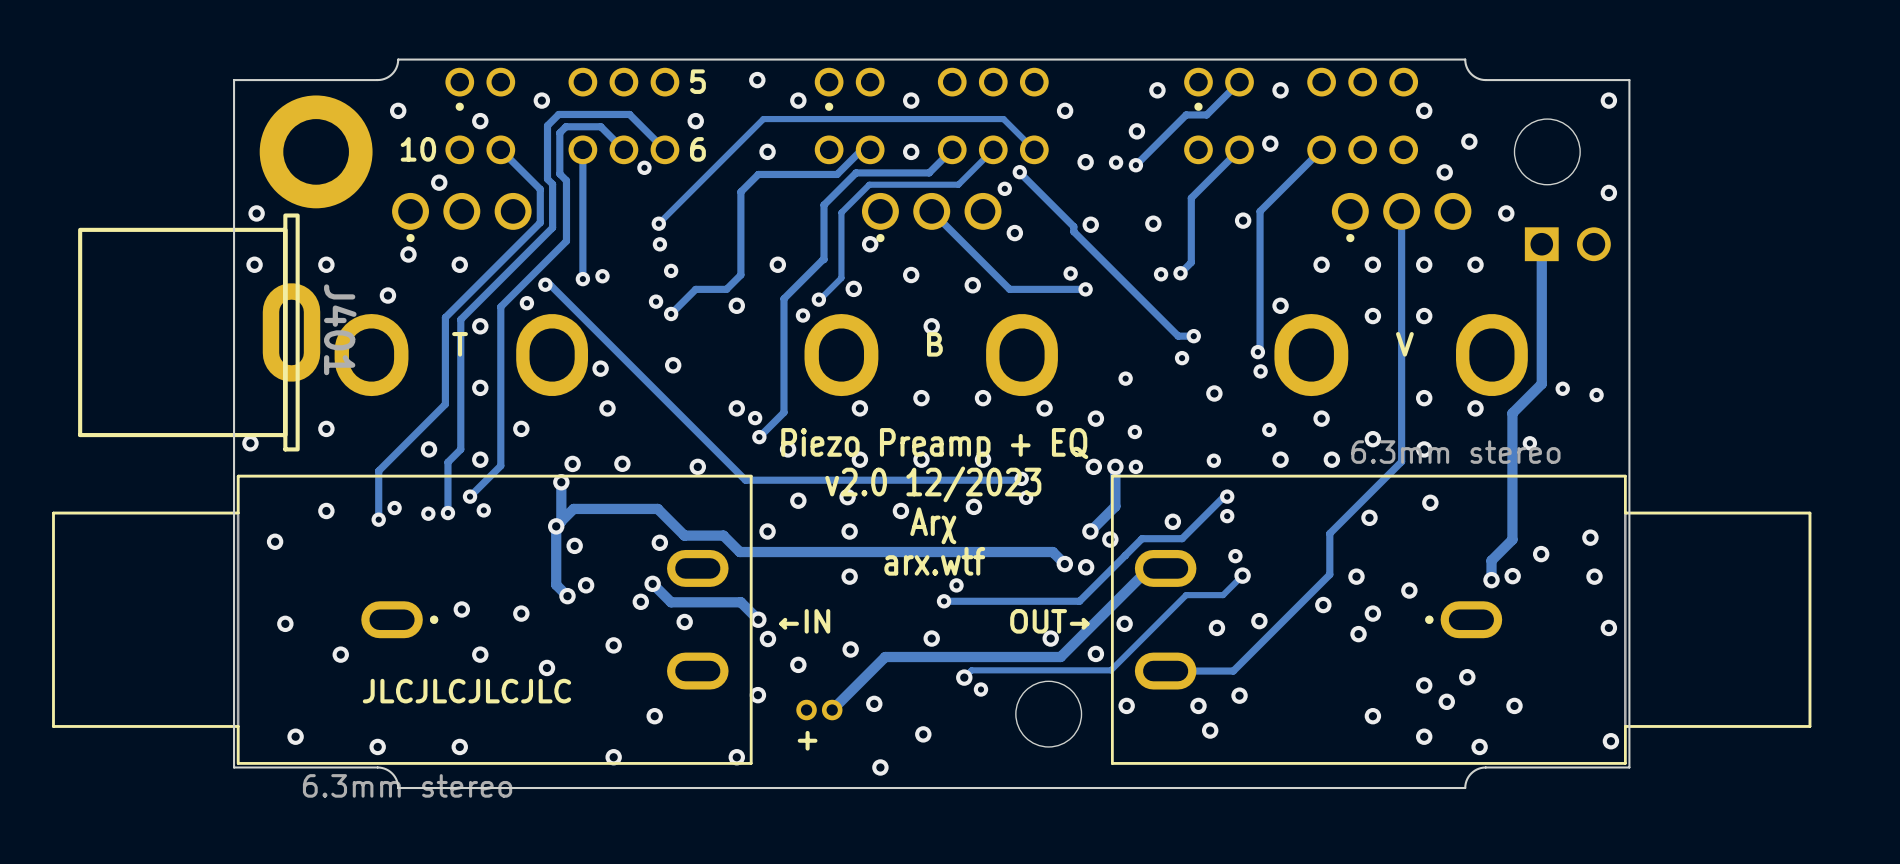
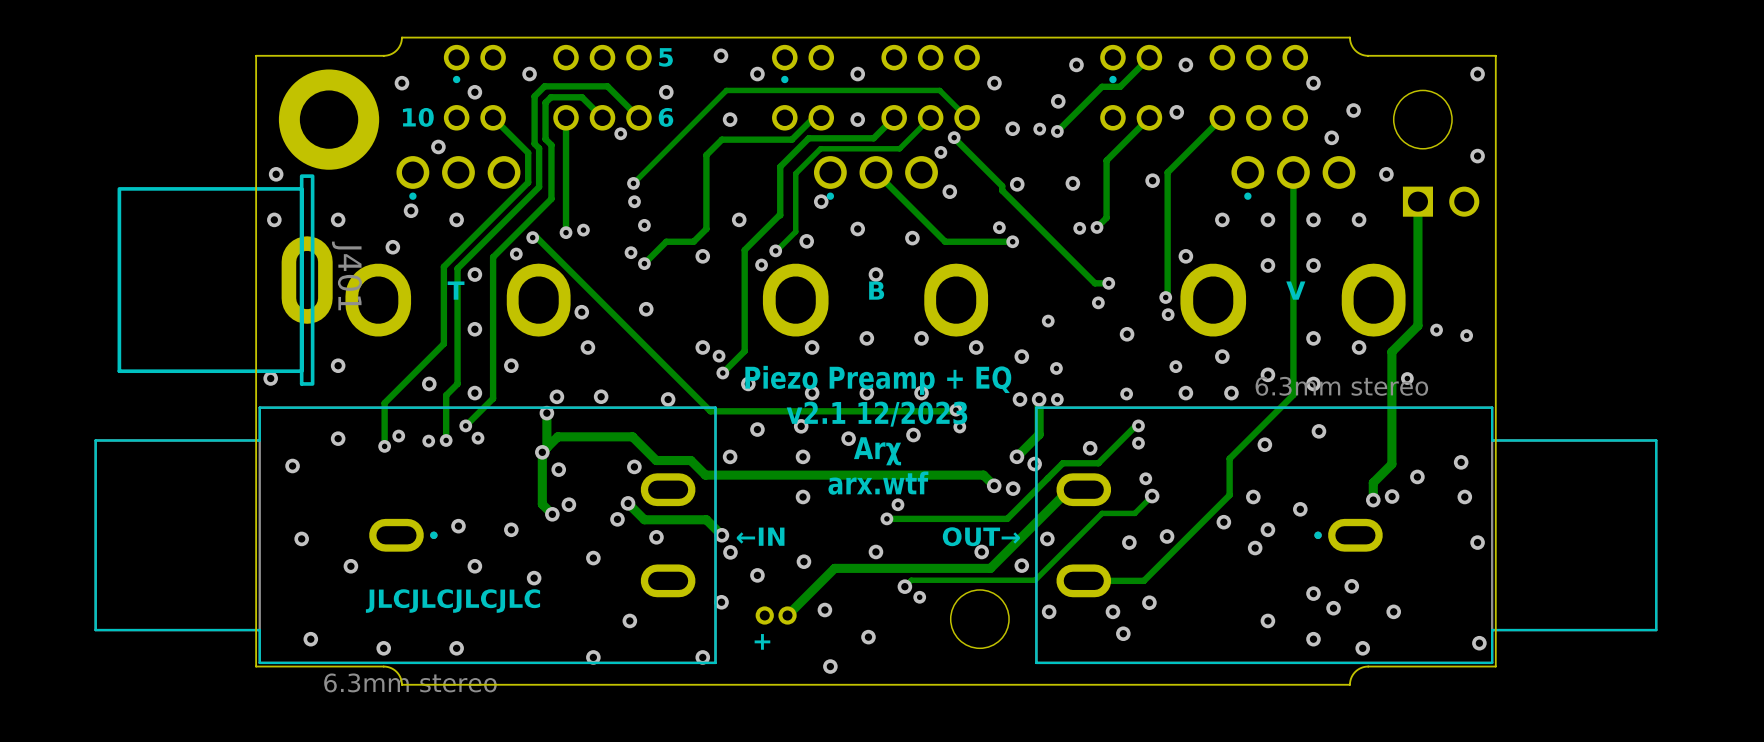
text: v2.0 12/2023 (933, 484) -> v2.1 12/2023 (876, 414)

